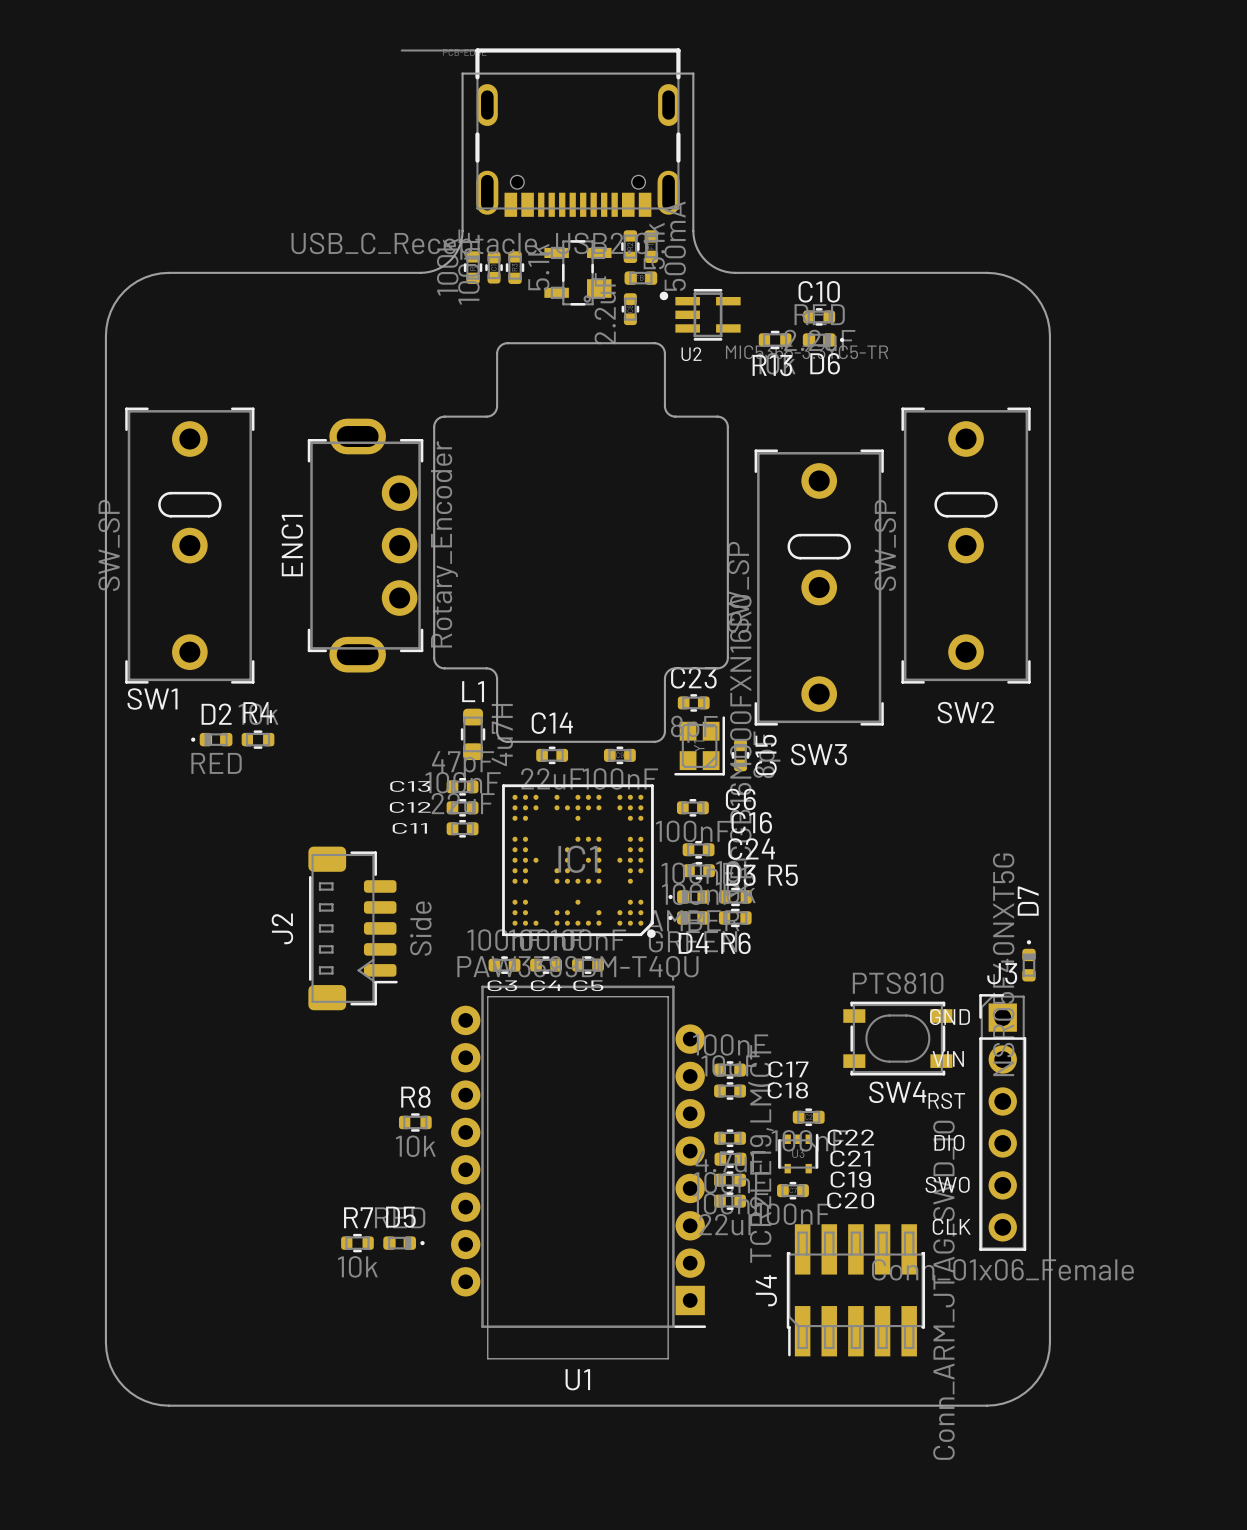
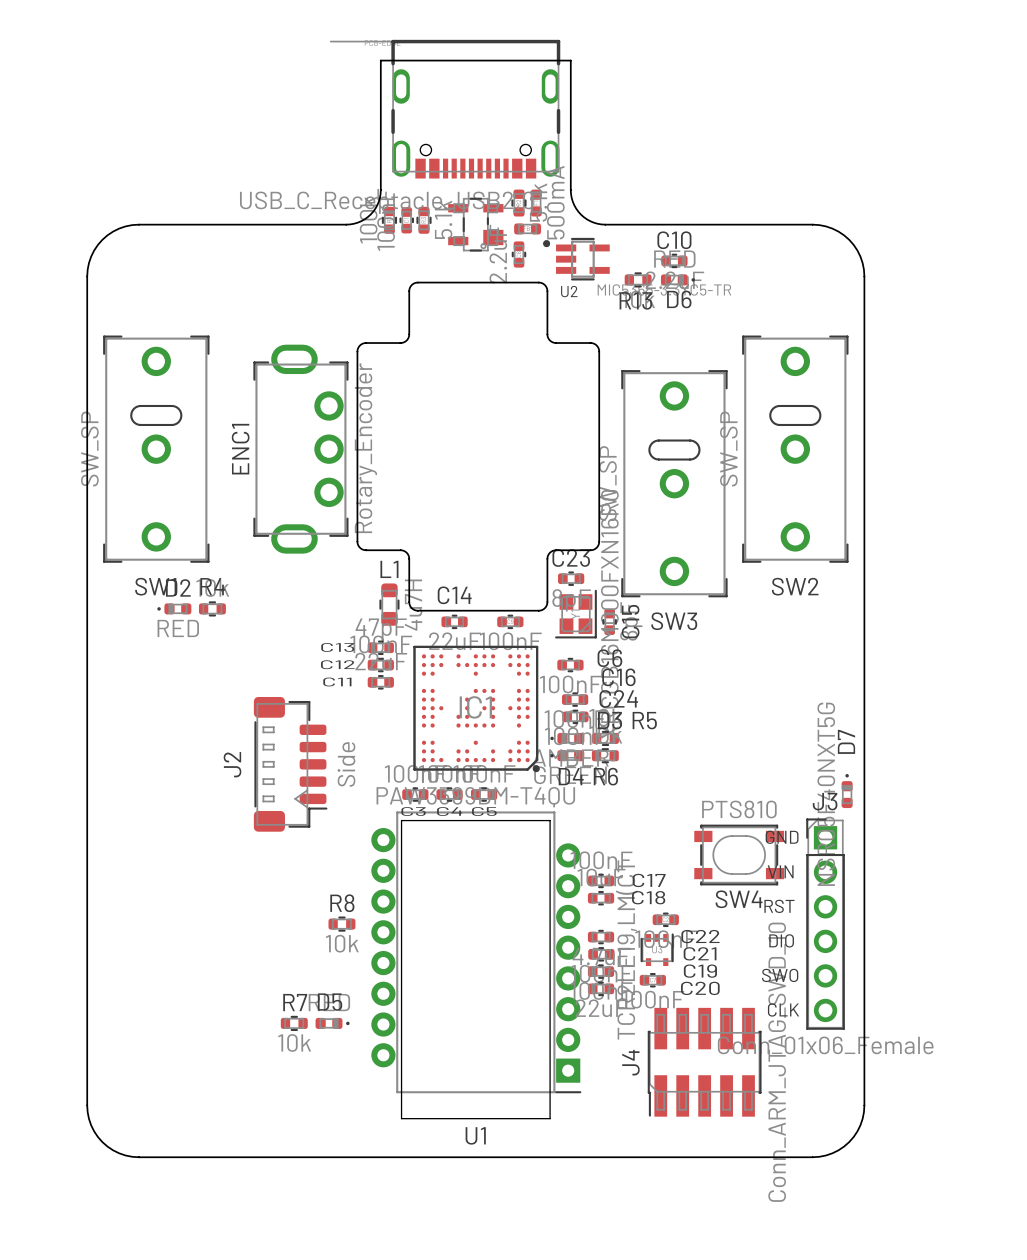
SW1 name position: SW1 (152, 698) -> SW1 (155, 586)

